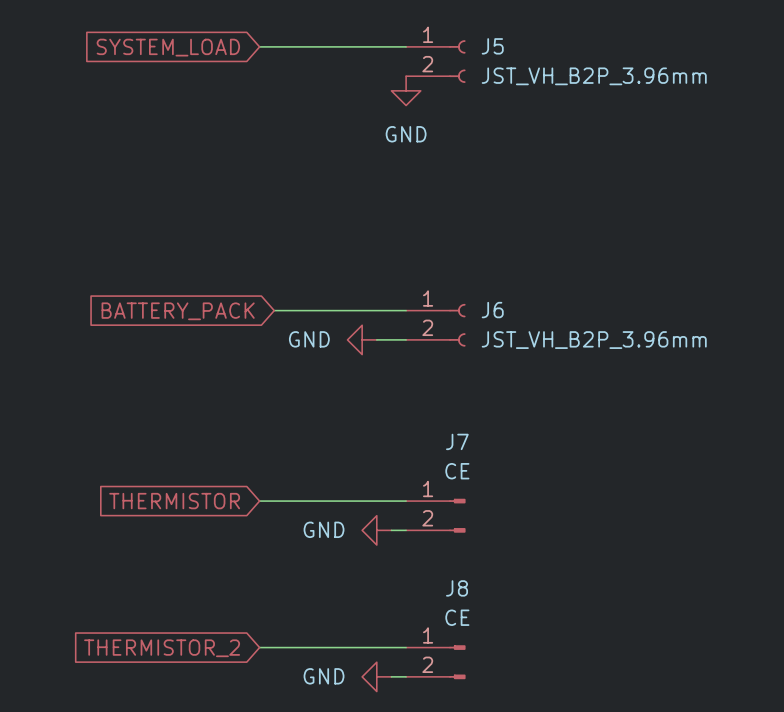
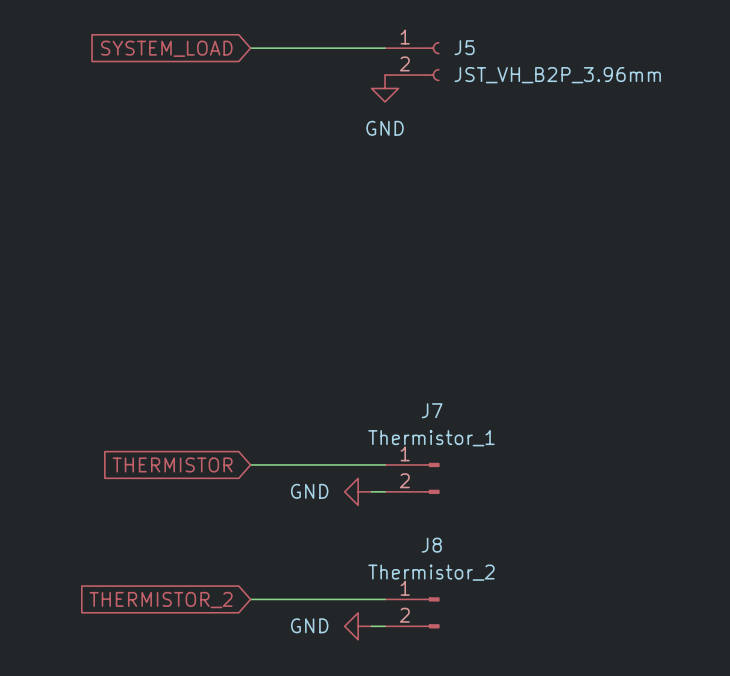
wire: (274, 310) (406, 310) -> none
global label: BATTERY_PACK (178, 311) -> none
J6: JST_VH_B2P_3.96mm (435, 325) -> none
power symbol: GND (362, 339) -> none
wire: (376, 339) (406, 339) -> none
J7 value: CE (457, 471) -> Thermistor_1 (431, 438)
J8 value: CE (457, 617) -> Thermistor_2 (431, 572)

